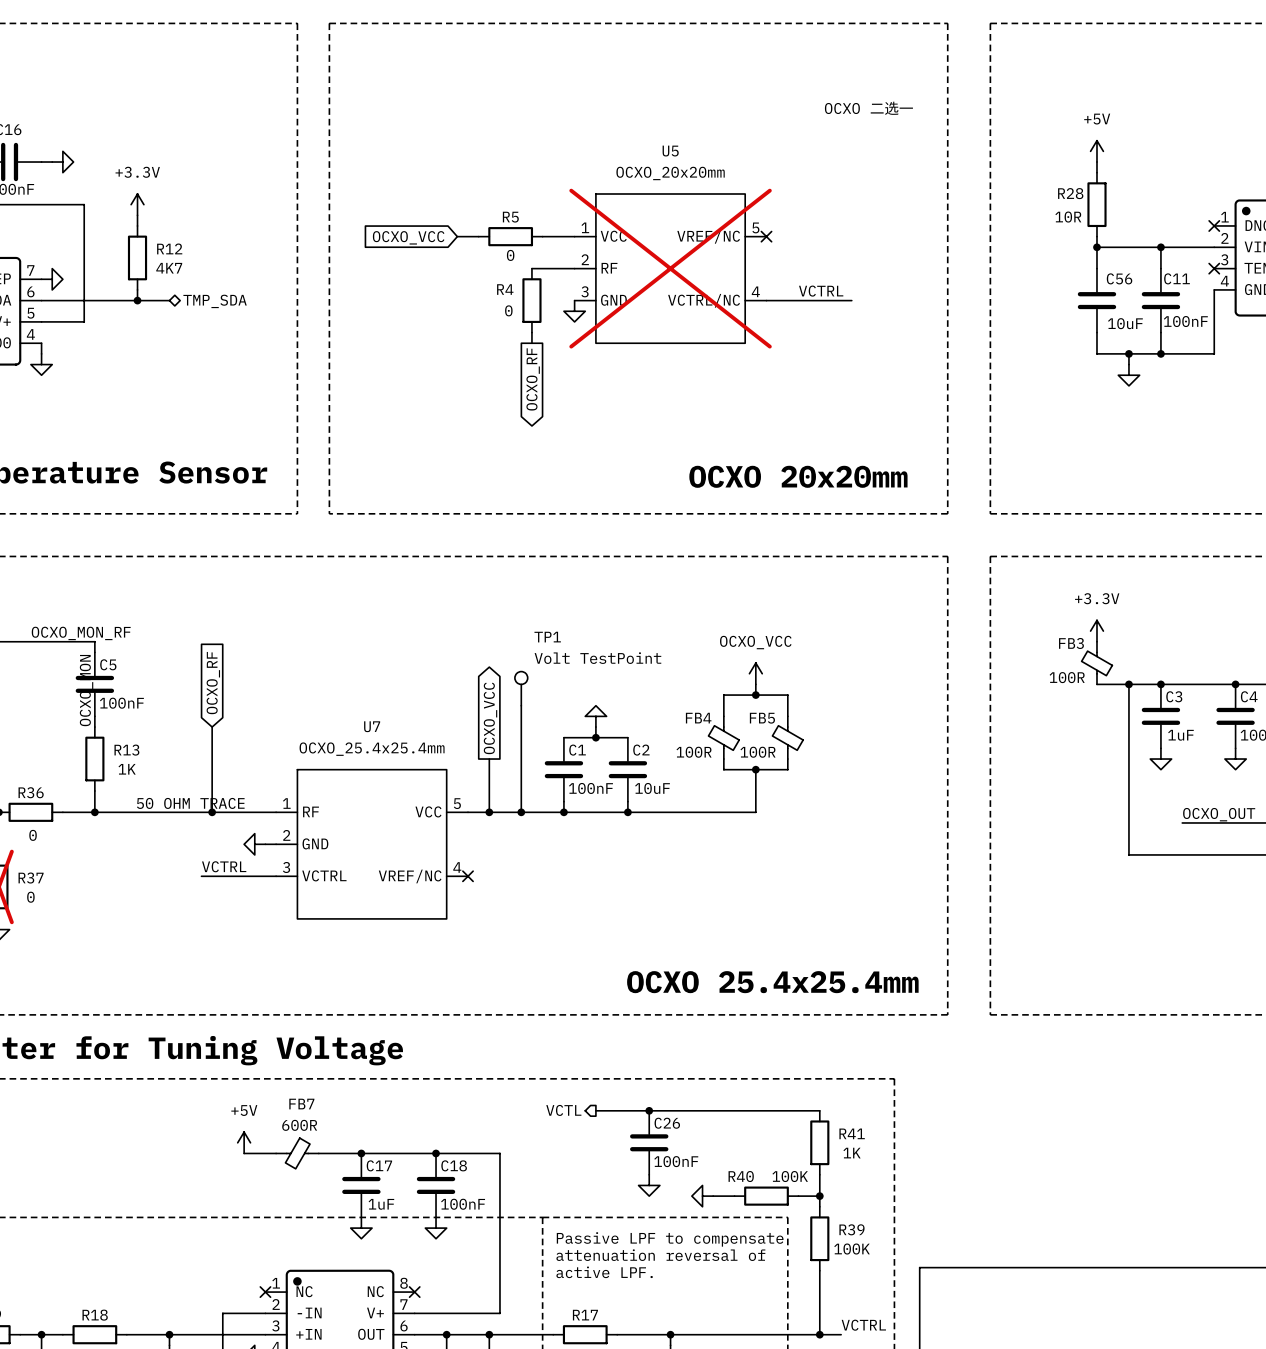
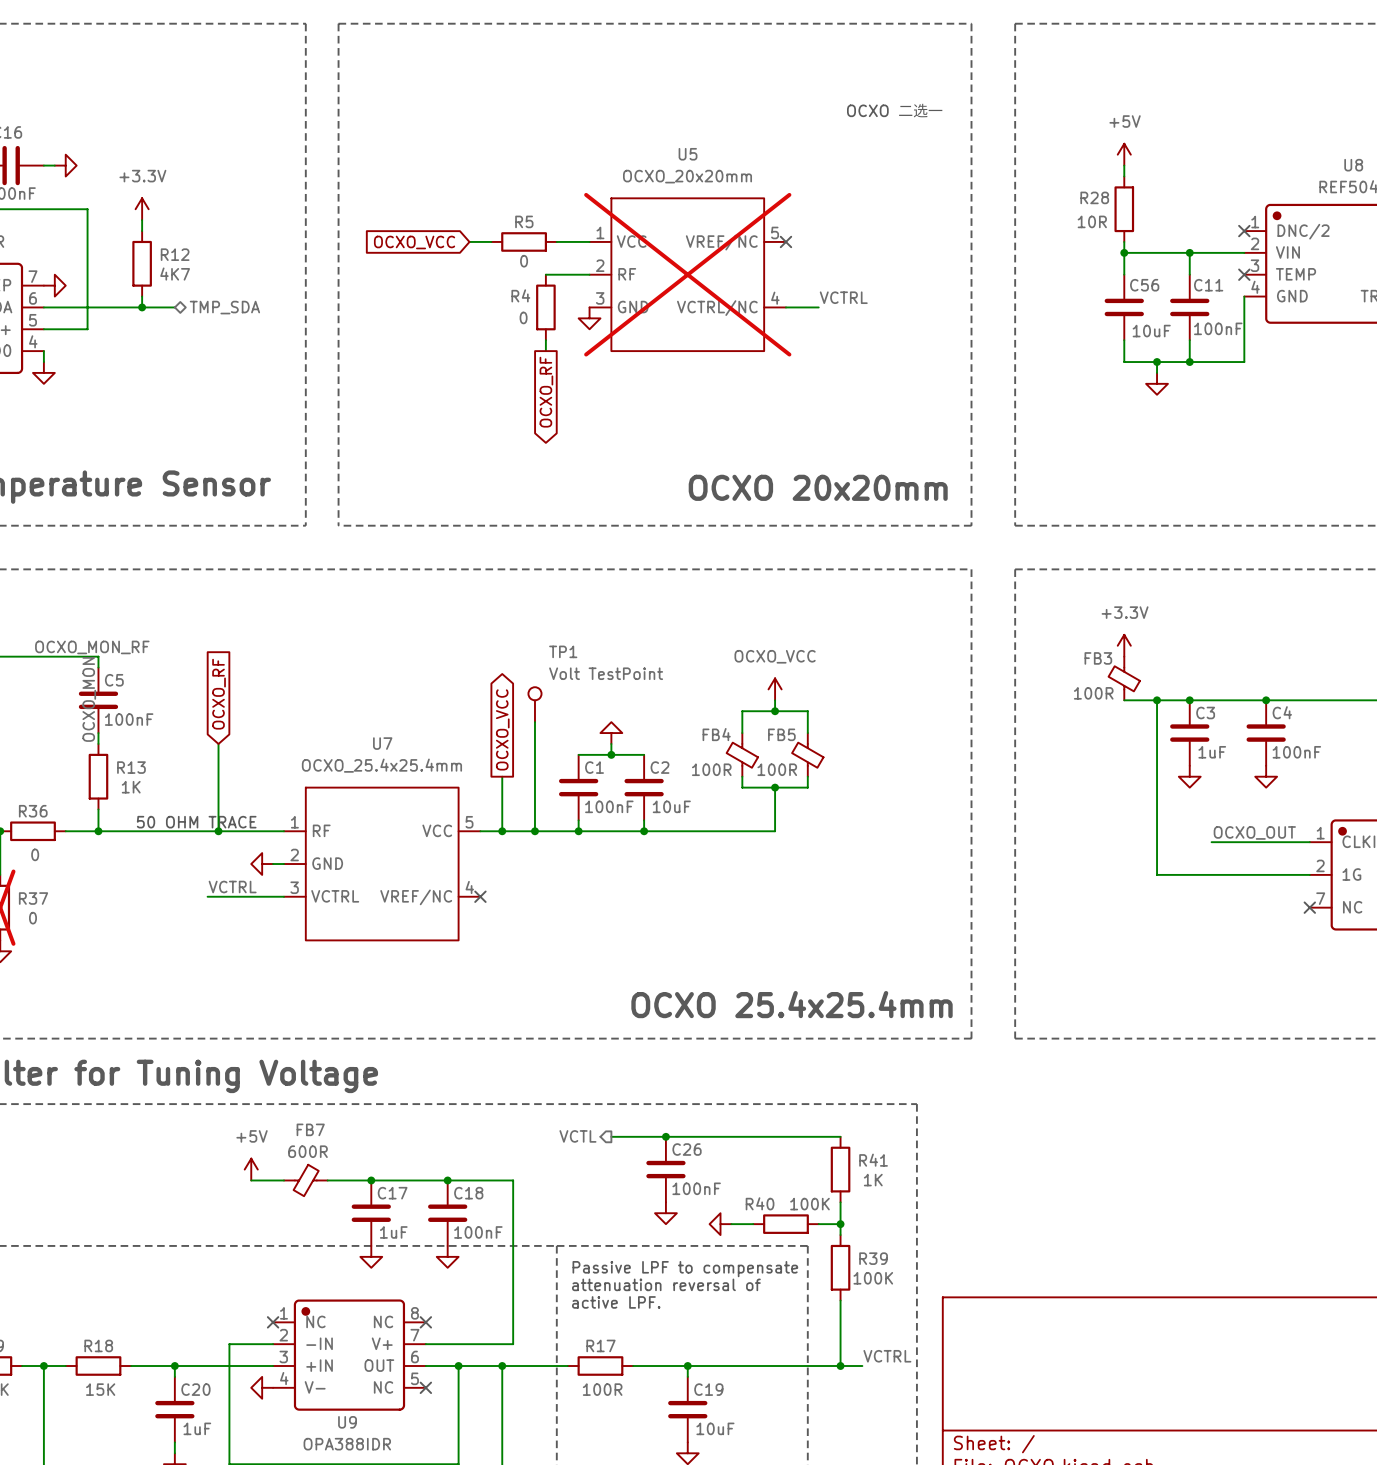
wire: (798, 300) (851, 300) -> none

